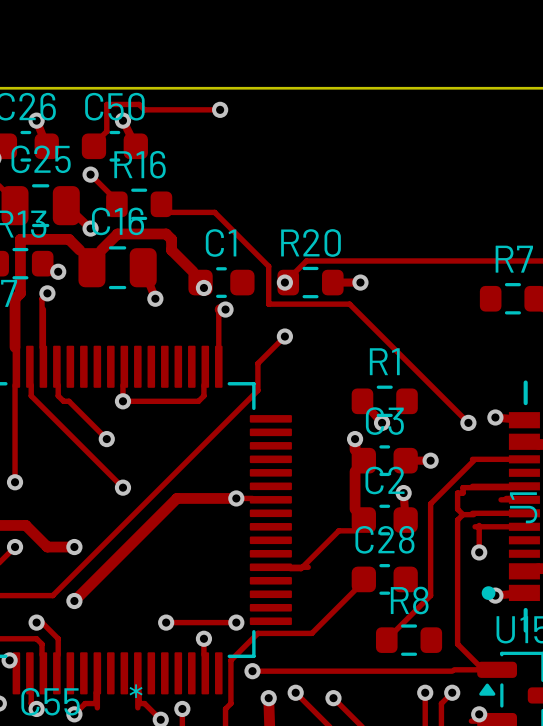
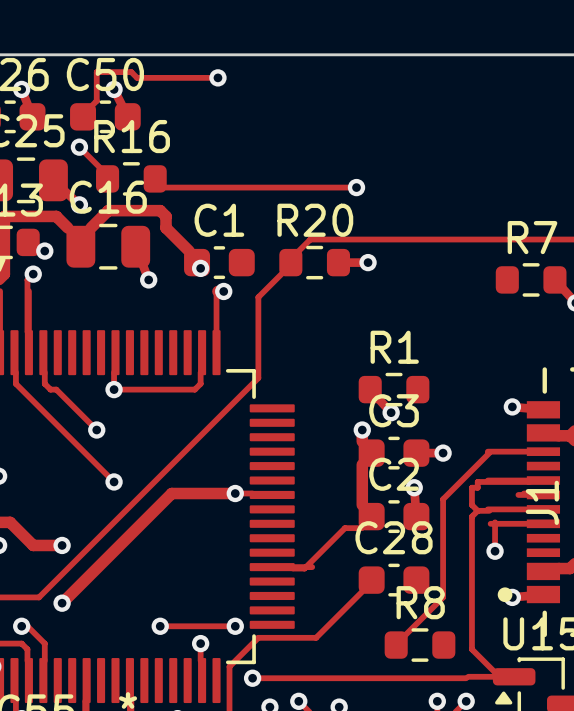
track: (214, 212) (268, 266) (268, 304) (349, 304) (468, 422) -> (212, 187) (356, 187)
via: none -> (356, 187)
via: (284, 282) -> none
track: (284, 336) (257, 363) -> (281, 274) (258, 297) (258, 349)
via: (284, 336) -> none
via: (468, 422) -> none

